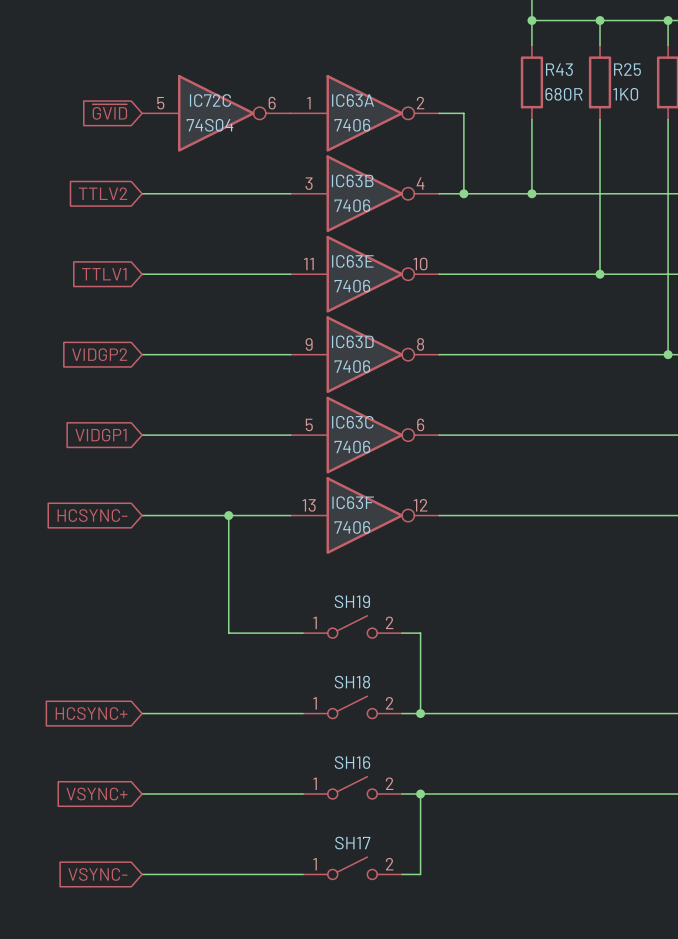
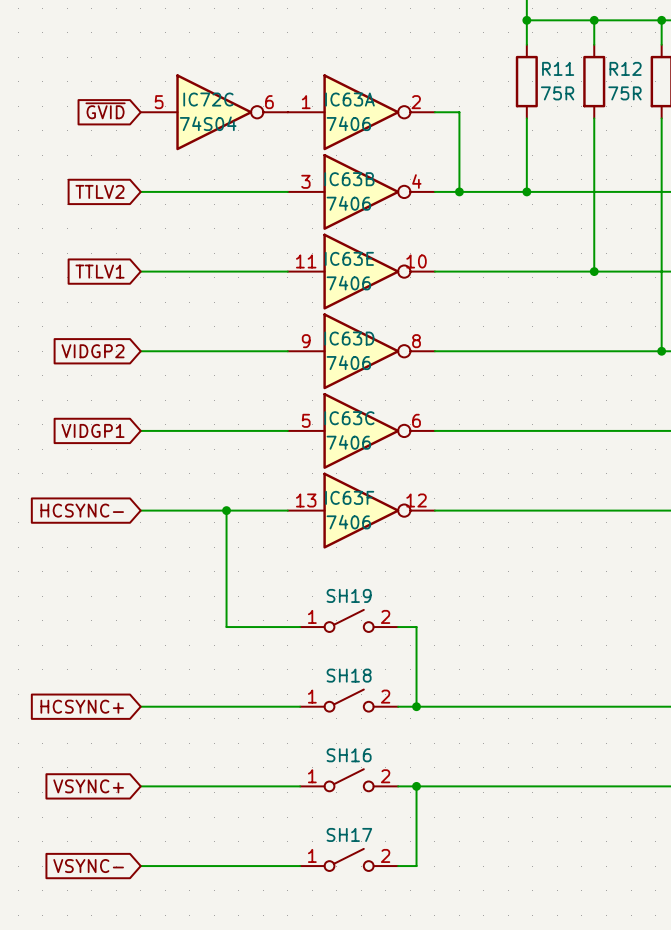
R43 name: R43 (559, 69) -> R11 (558, 68)
R25 name: R25 (627, 69) -> R12 (625, 68)
R43 value: 680R (564, 94) -> 75R (557, 93)
R25 value: 1K0 (625, 94) -> 75R (624, 93)

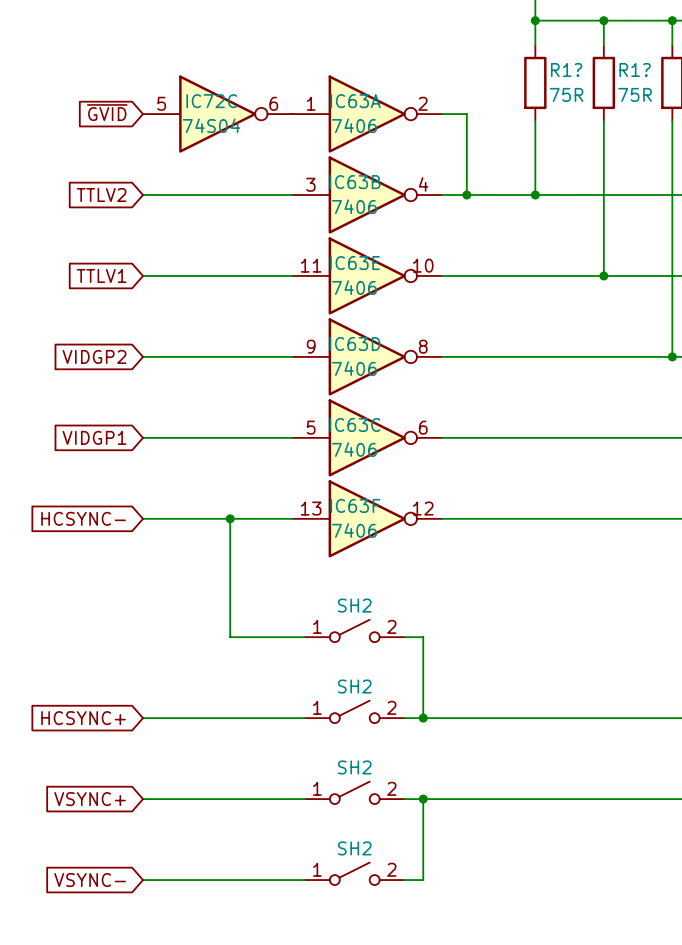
R11 name: R11 (558, 68) -> R1? (566, 70)
R12 name: R12 (625, 68) -> R1? (635, 70)
SH19 name: SH19 (349, 595) -> SH2 (354, 605)
SH18 name: SH18 (349, 675) -> SH2 (354, 686)
SH16 name: SH16 (349, 755) -> SH2 (354, 767)
SH17 name: SH17 (349, 834) -> SH2 (354, 848)

